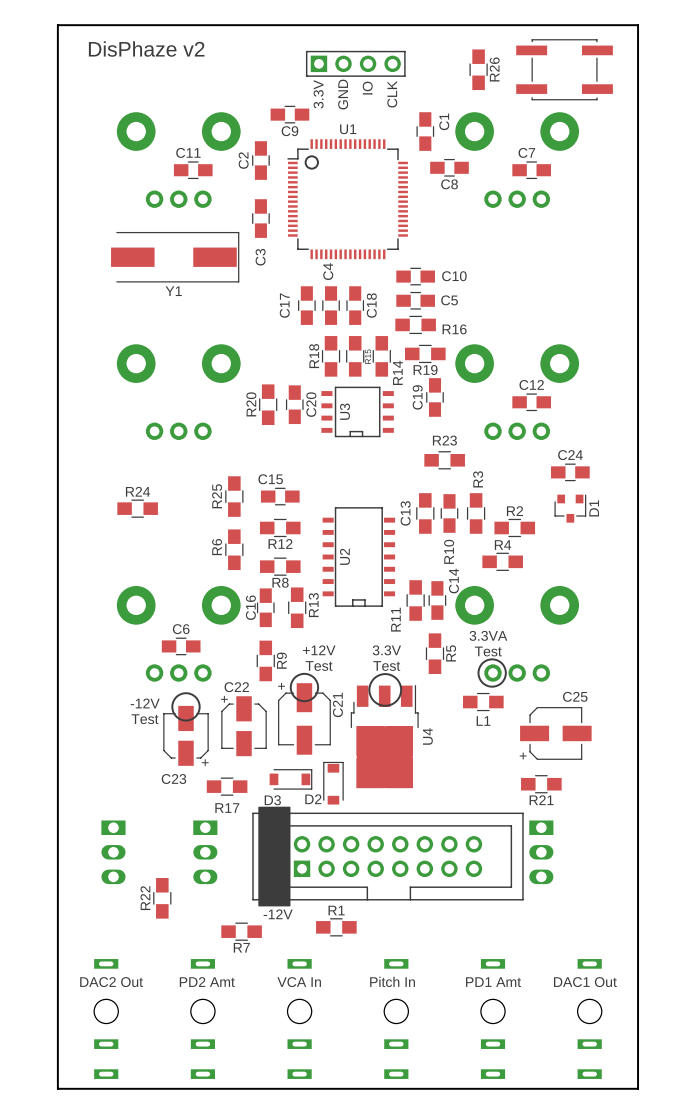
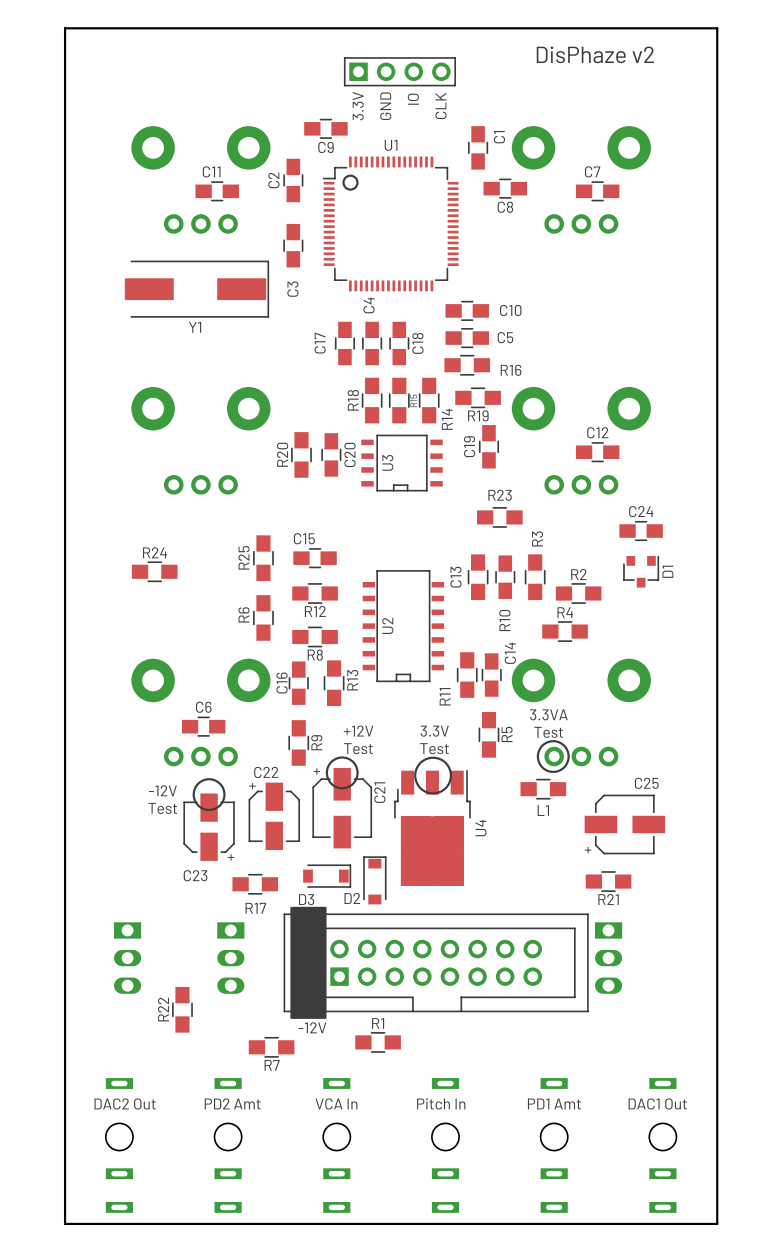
text: none -> DisPhaze v2 (595, 54)
text: DisPhaze v2 (146, 49) -> none
R26: (478, 69) -> none
part: (564, 69) -> none

